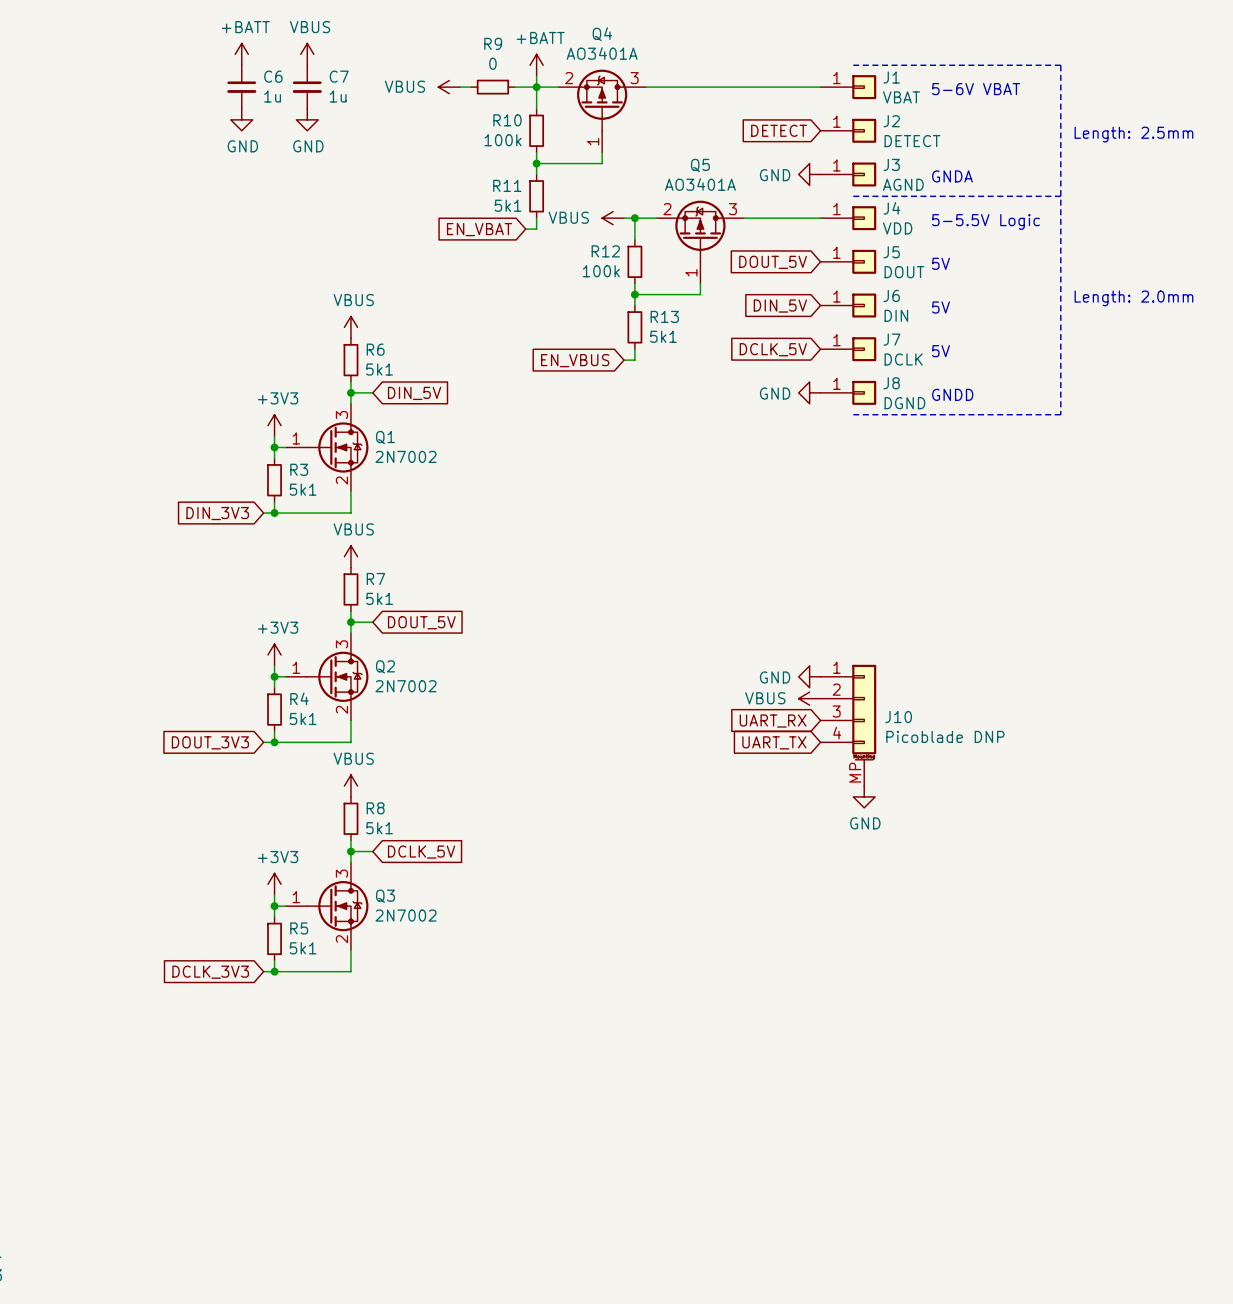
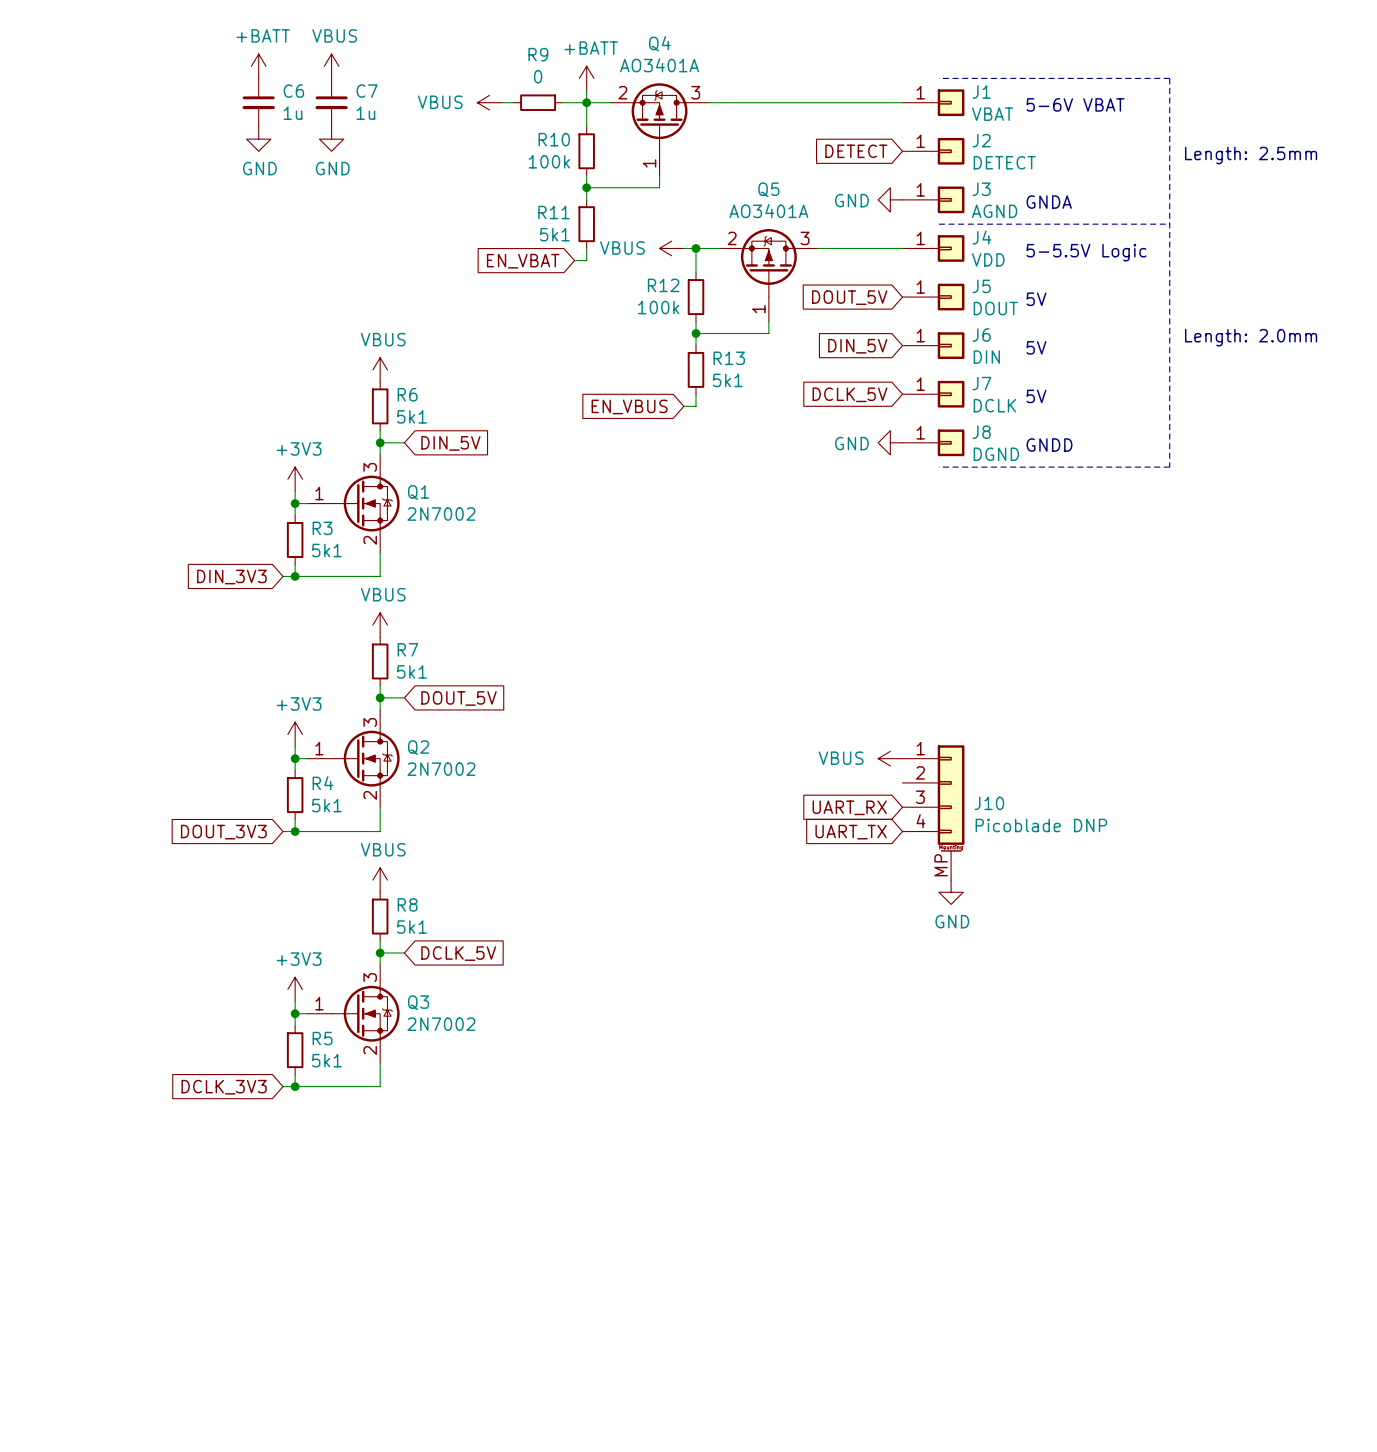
power symbol: GND (809, 676) -> VBUS (890, 758)
power symbol: VBUS (809, 698) -> none

